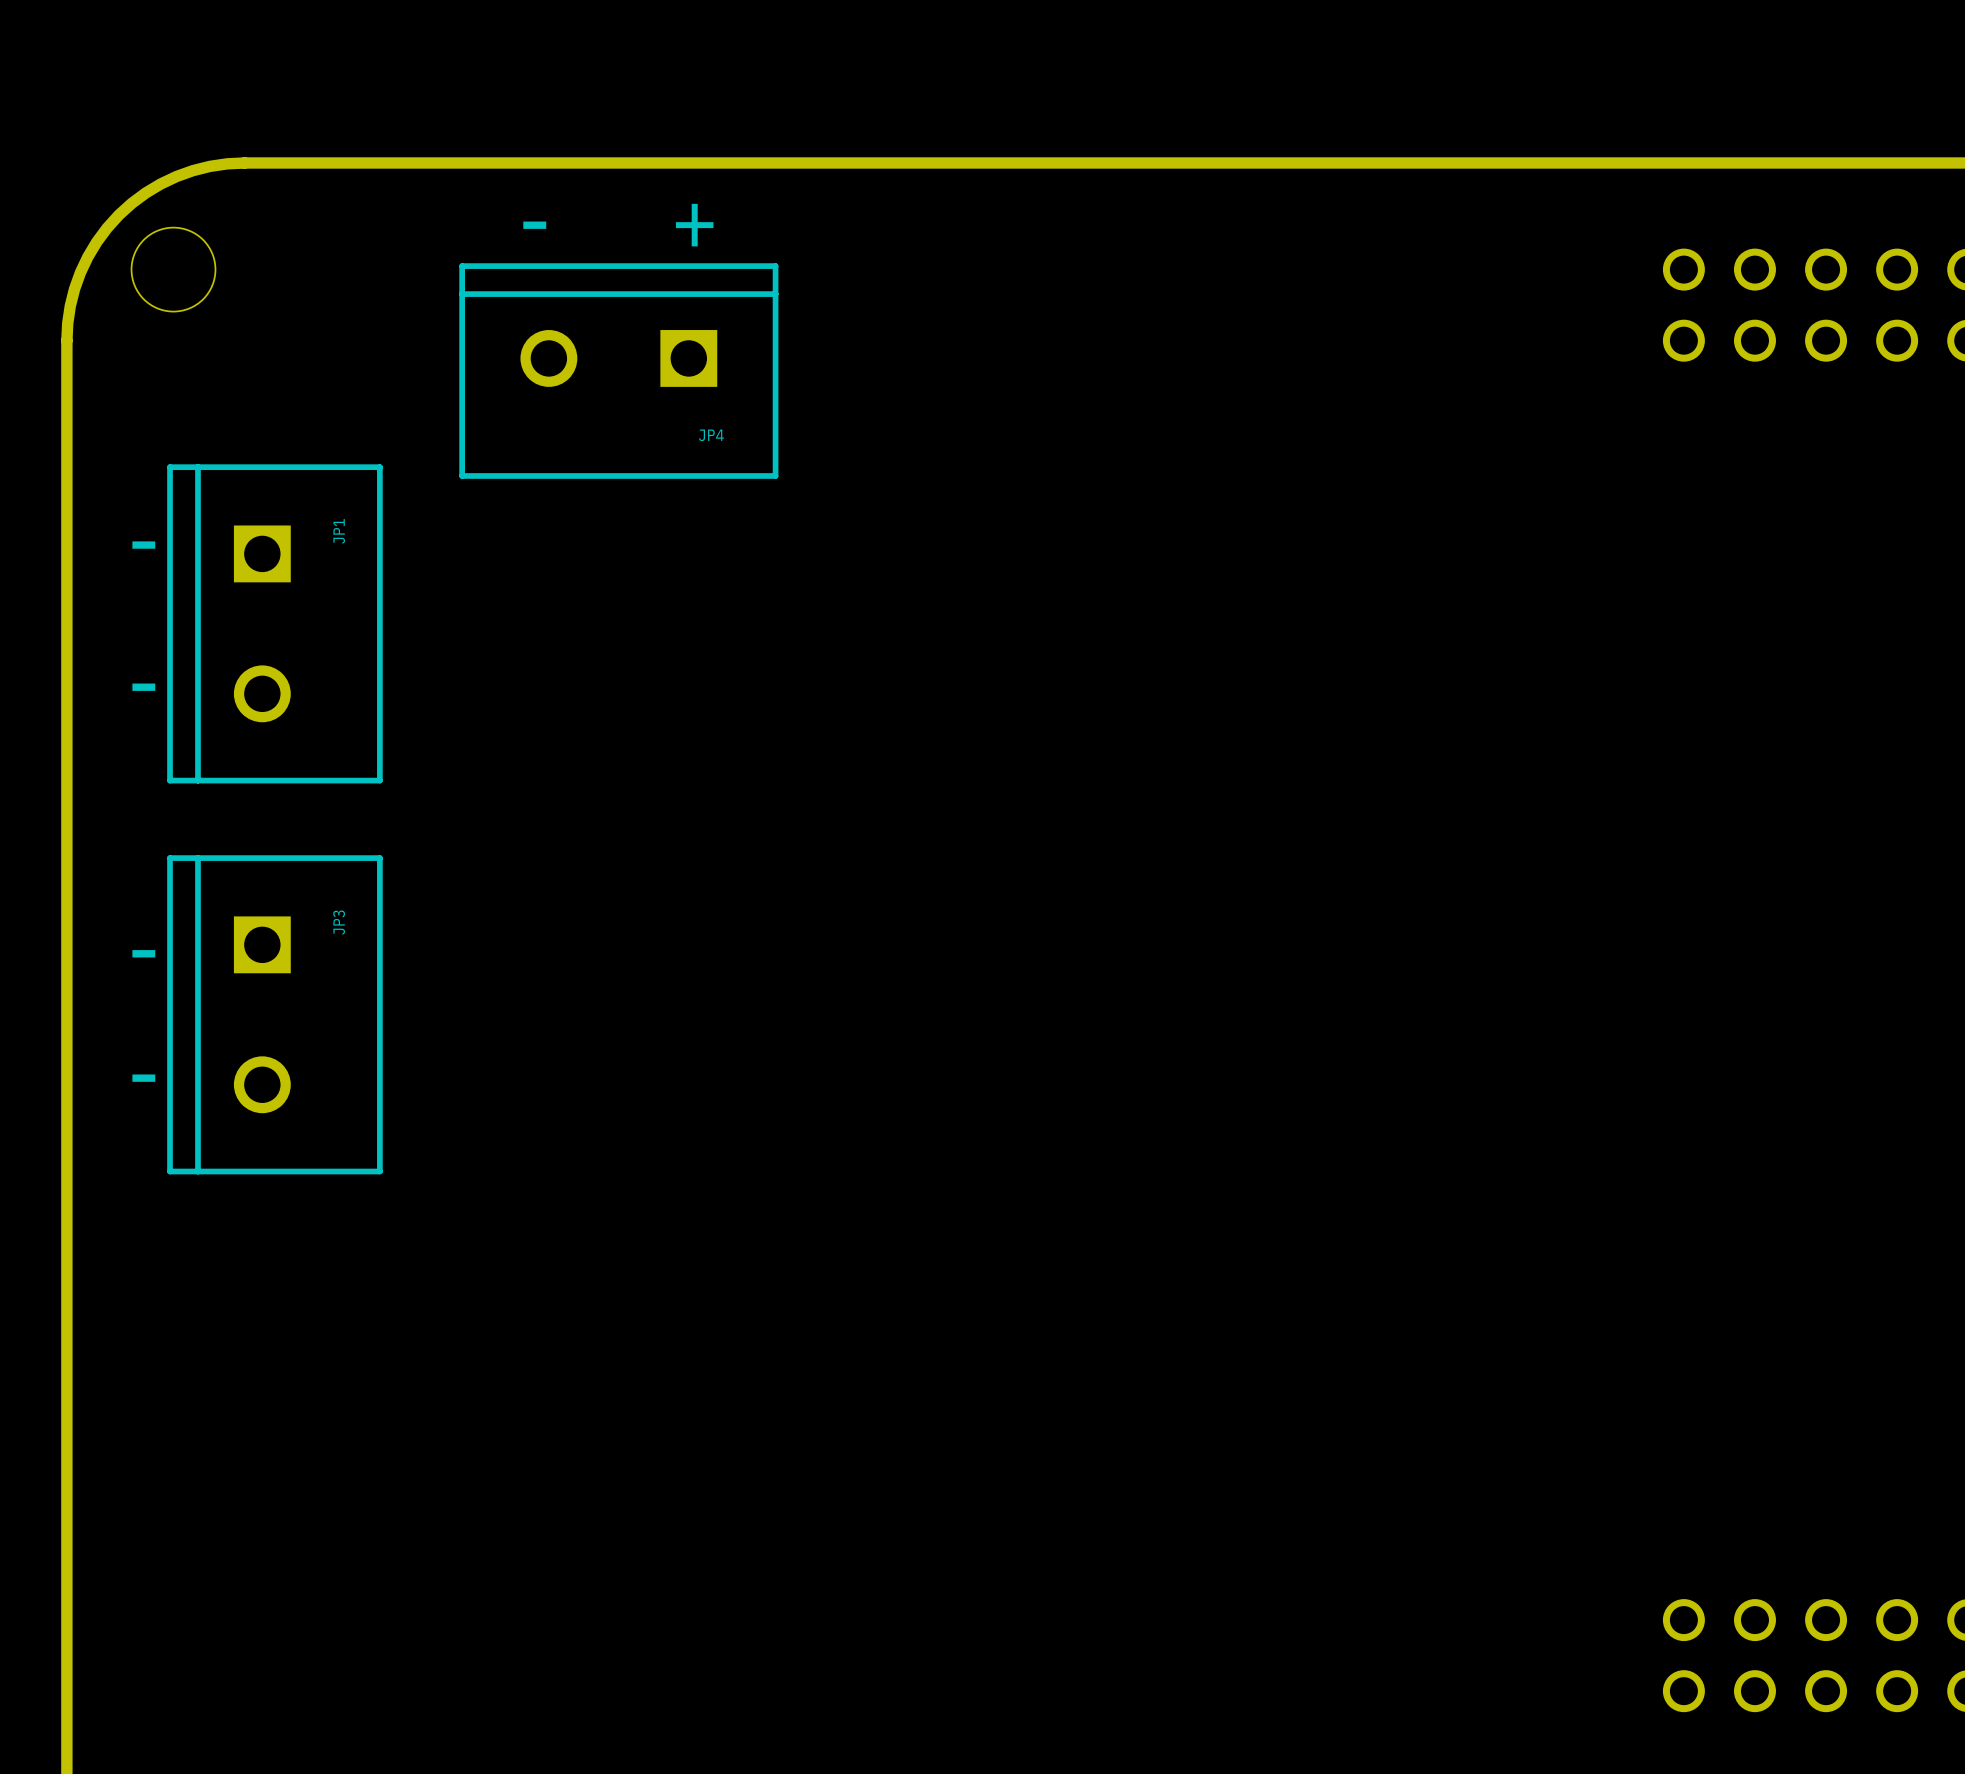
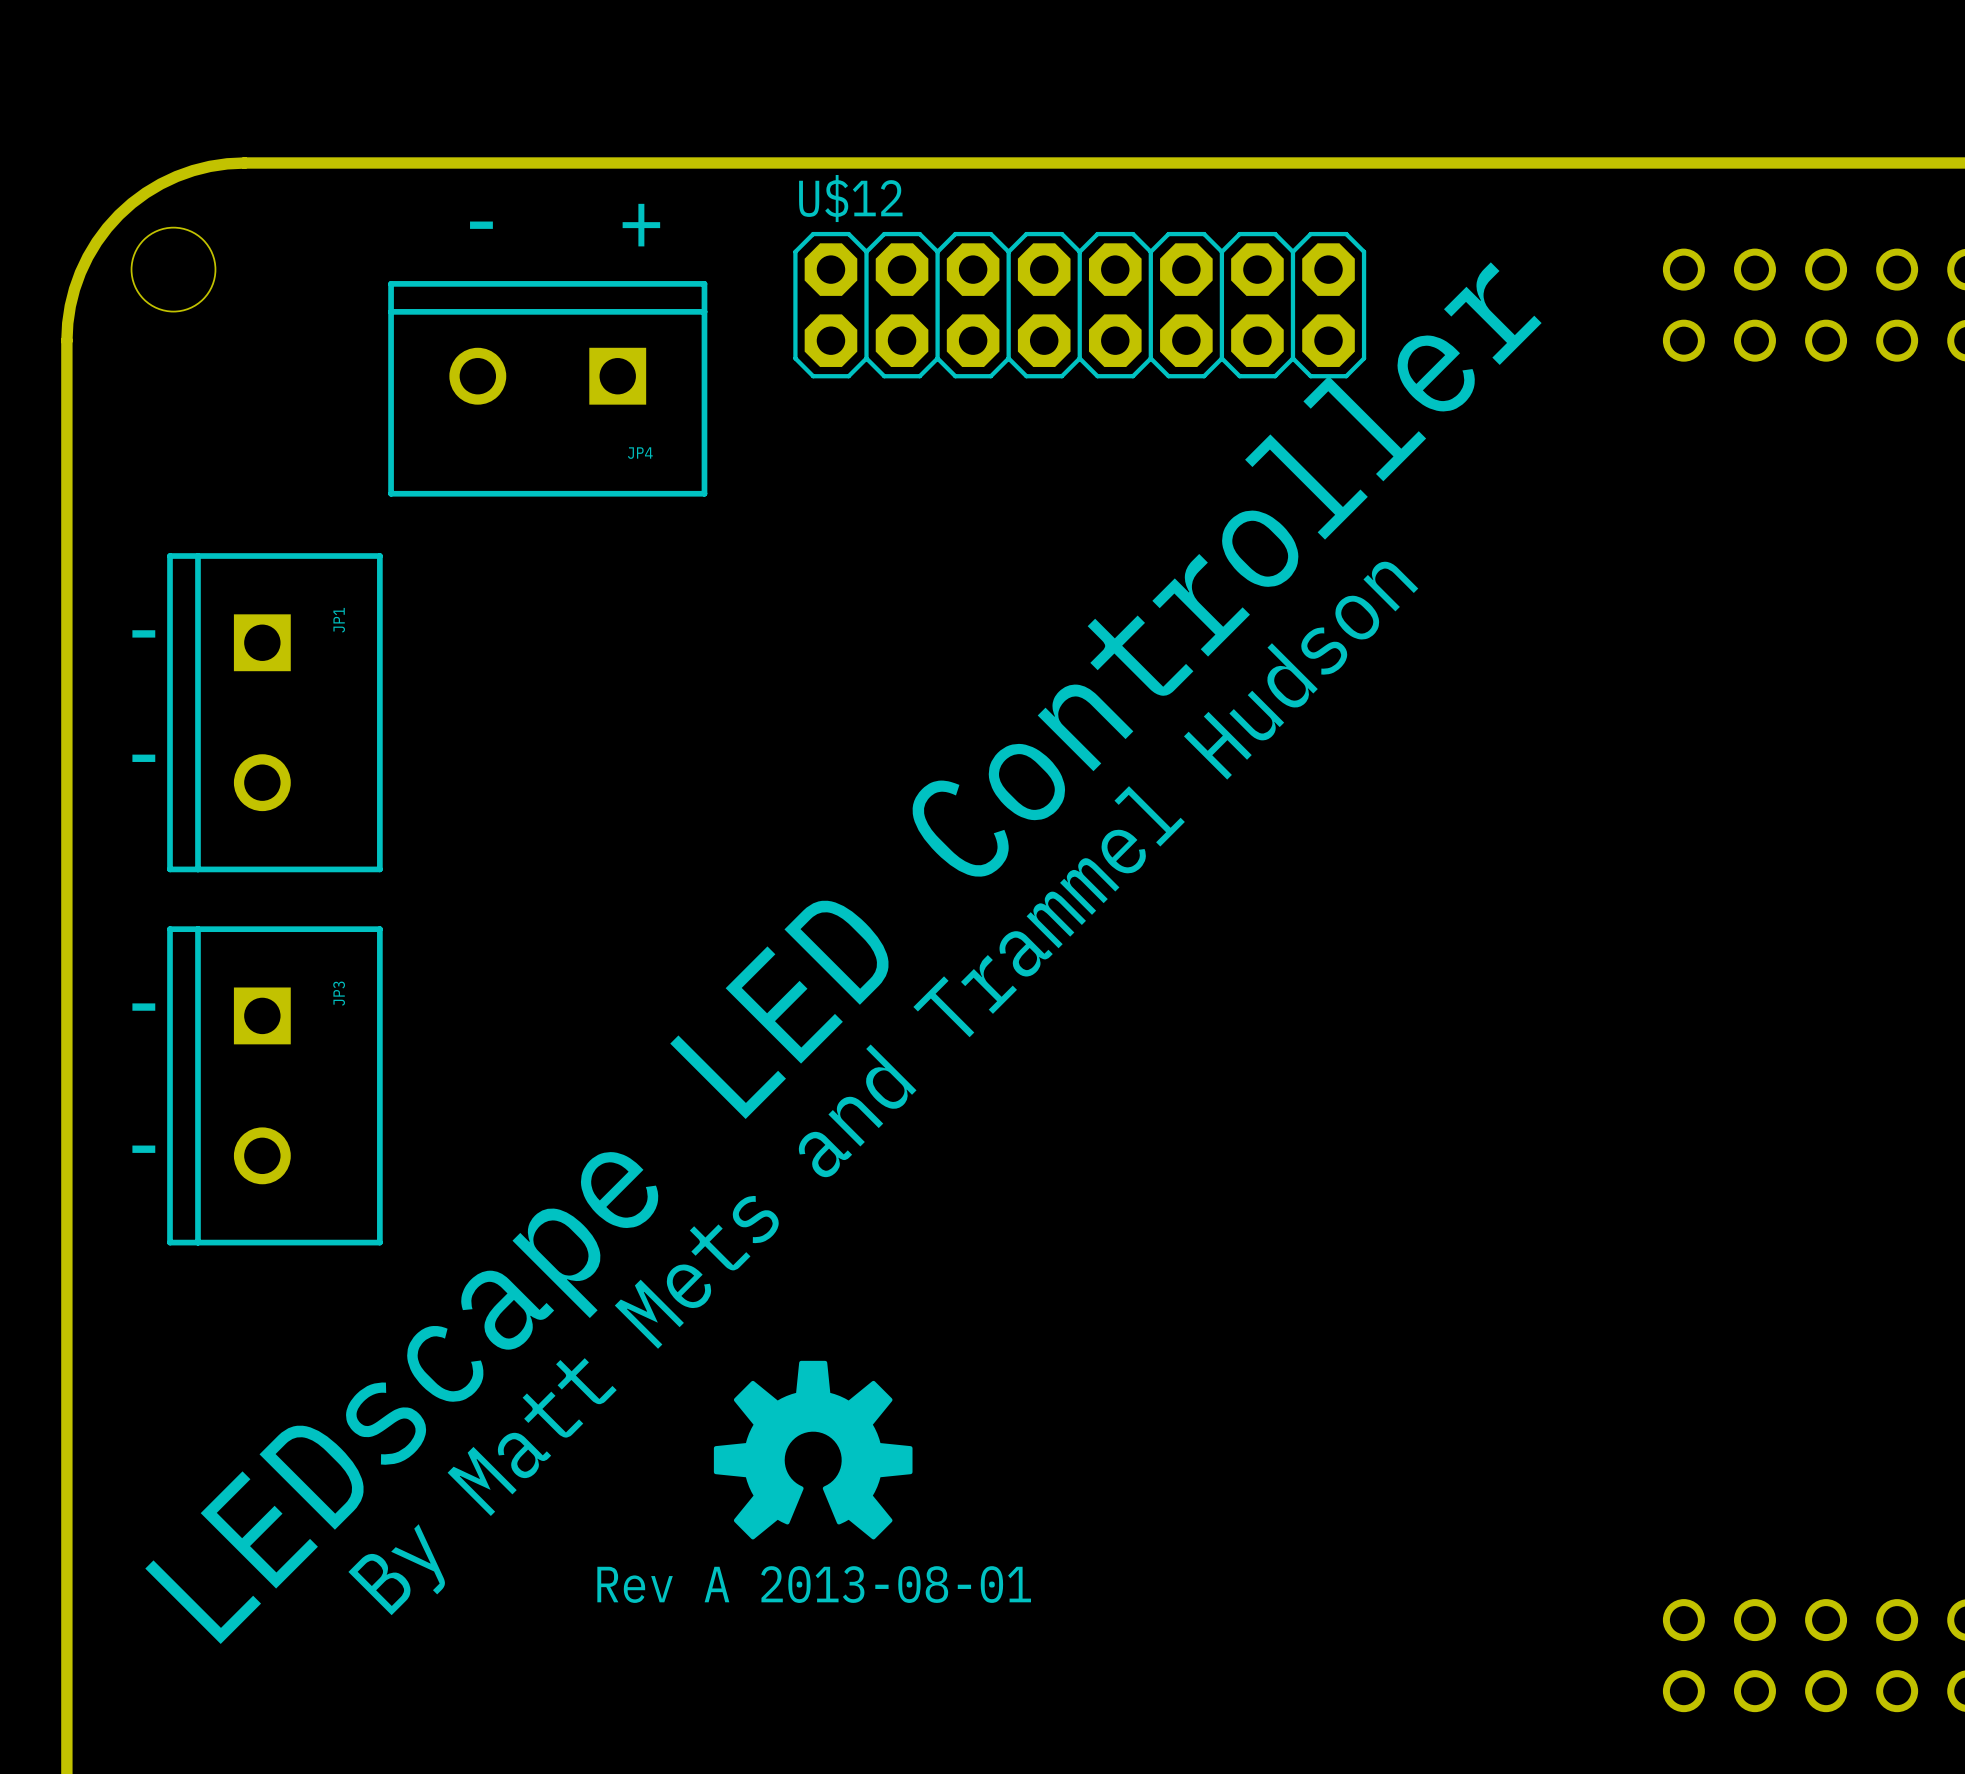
text position: - (534, 225) -> - (481, 225)
text position: + (694, 225) -> + (641, 225)
U$12: none -> (1079, 305)
JP4 position: (618, 371) -> (547, 388)
text: - (143, 545) -> none
JP1 position: (274, 623) -> (274, 712)
text: none -> - (143, 633)
text: - (143, 687) -> none
text: none -> - (143, 758)
text: - (143, 953) -> none
text: none -> LEDscape LED Controller (843, 953)
text: none -> - (143, 1007)
JP3 position: (274, 1014) -> (274, 1085)
text: - (143, 1078) -> none
text: none -> By Matt Mets and Trammel Hudson (883, 1088)
text: none -> - (143, 1149)
drawing: none -> [713, 1360, 913, 1540]
text: none -> Rev A 2013-08-01 (814, 1584)

